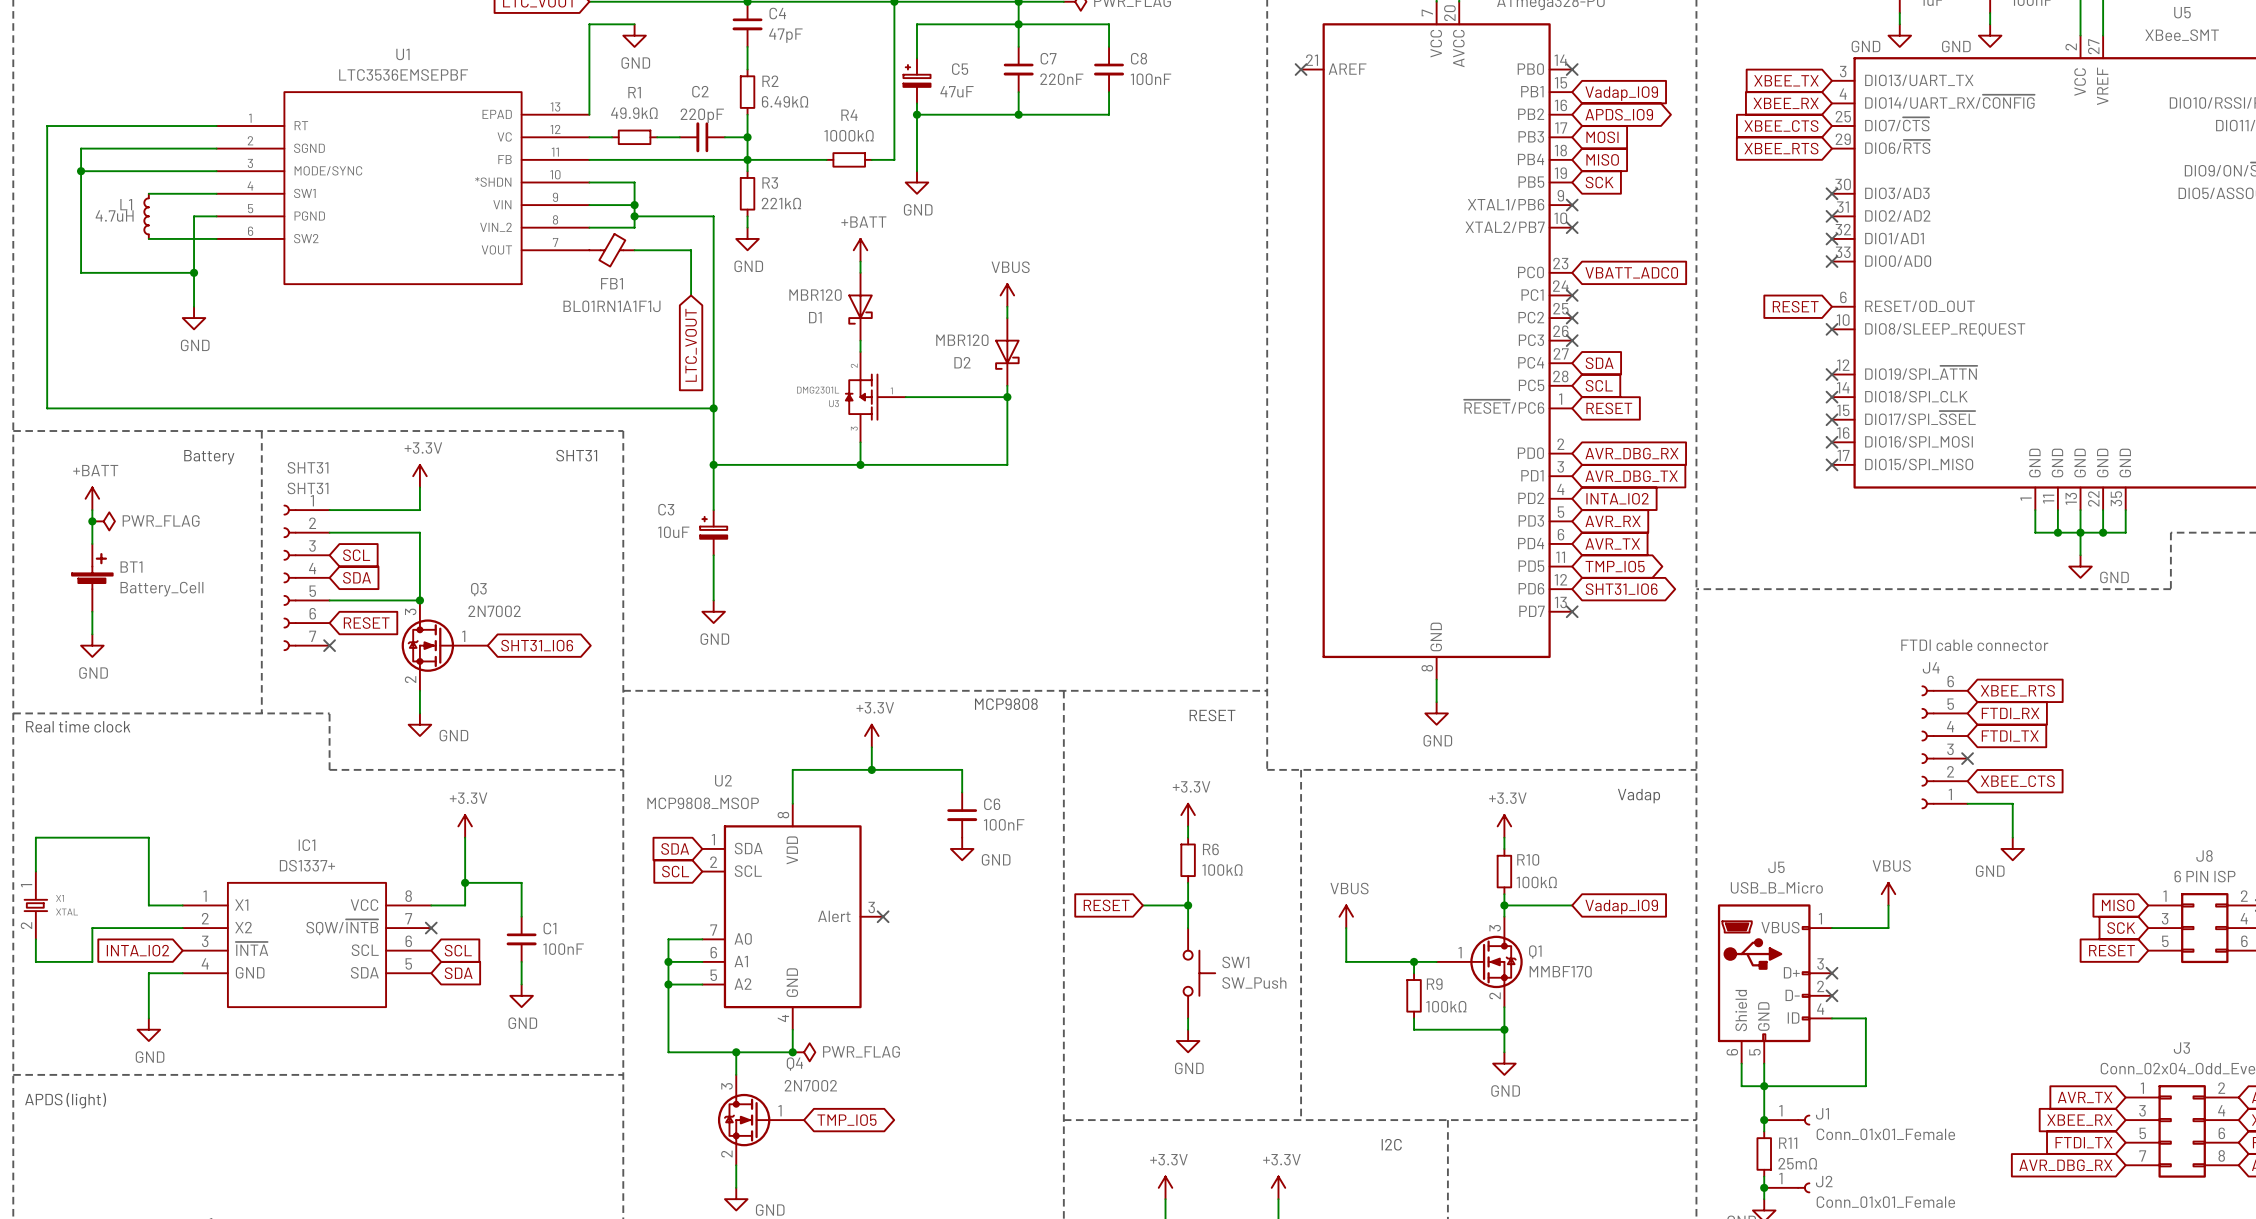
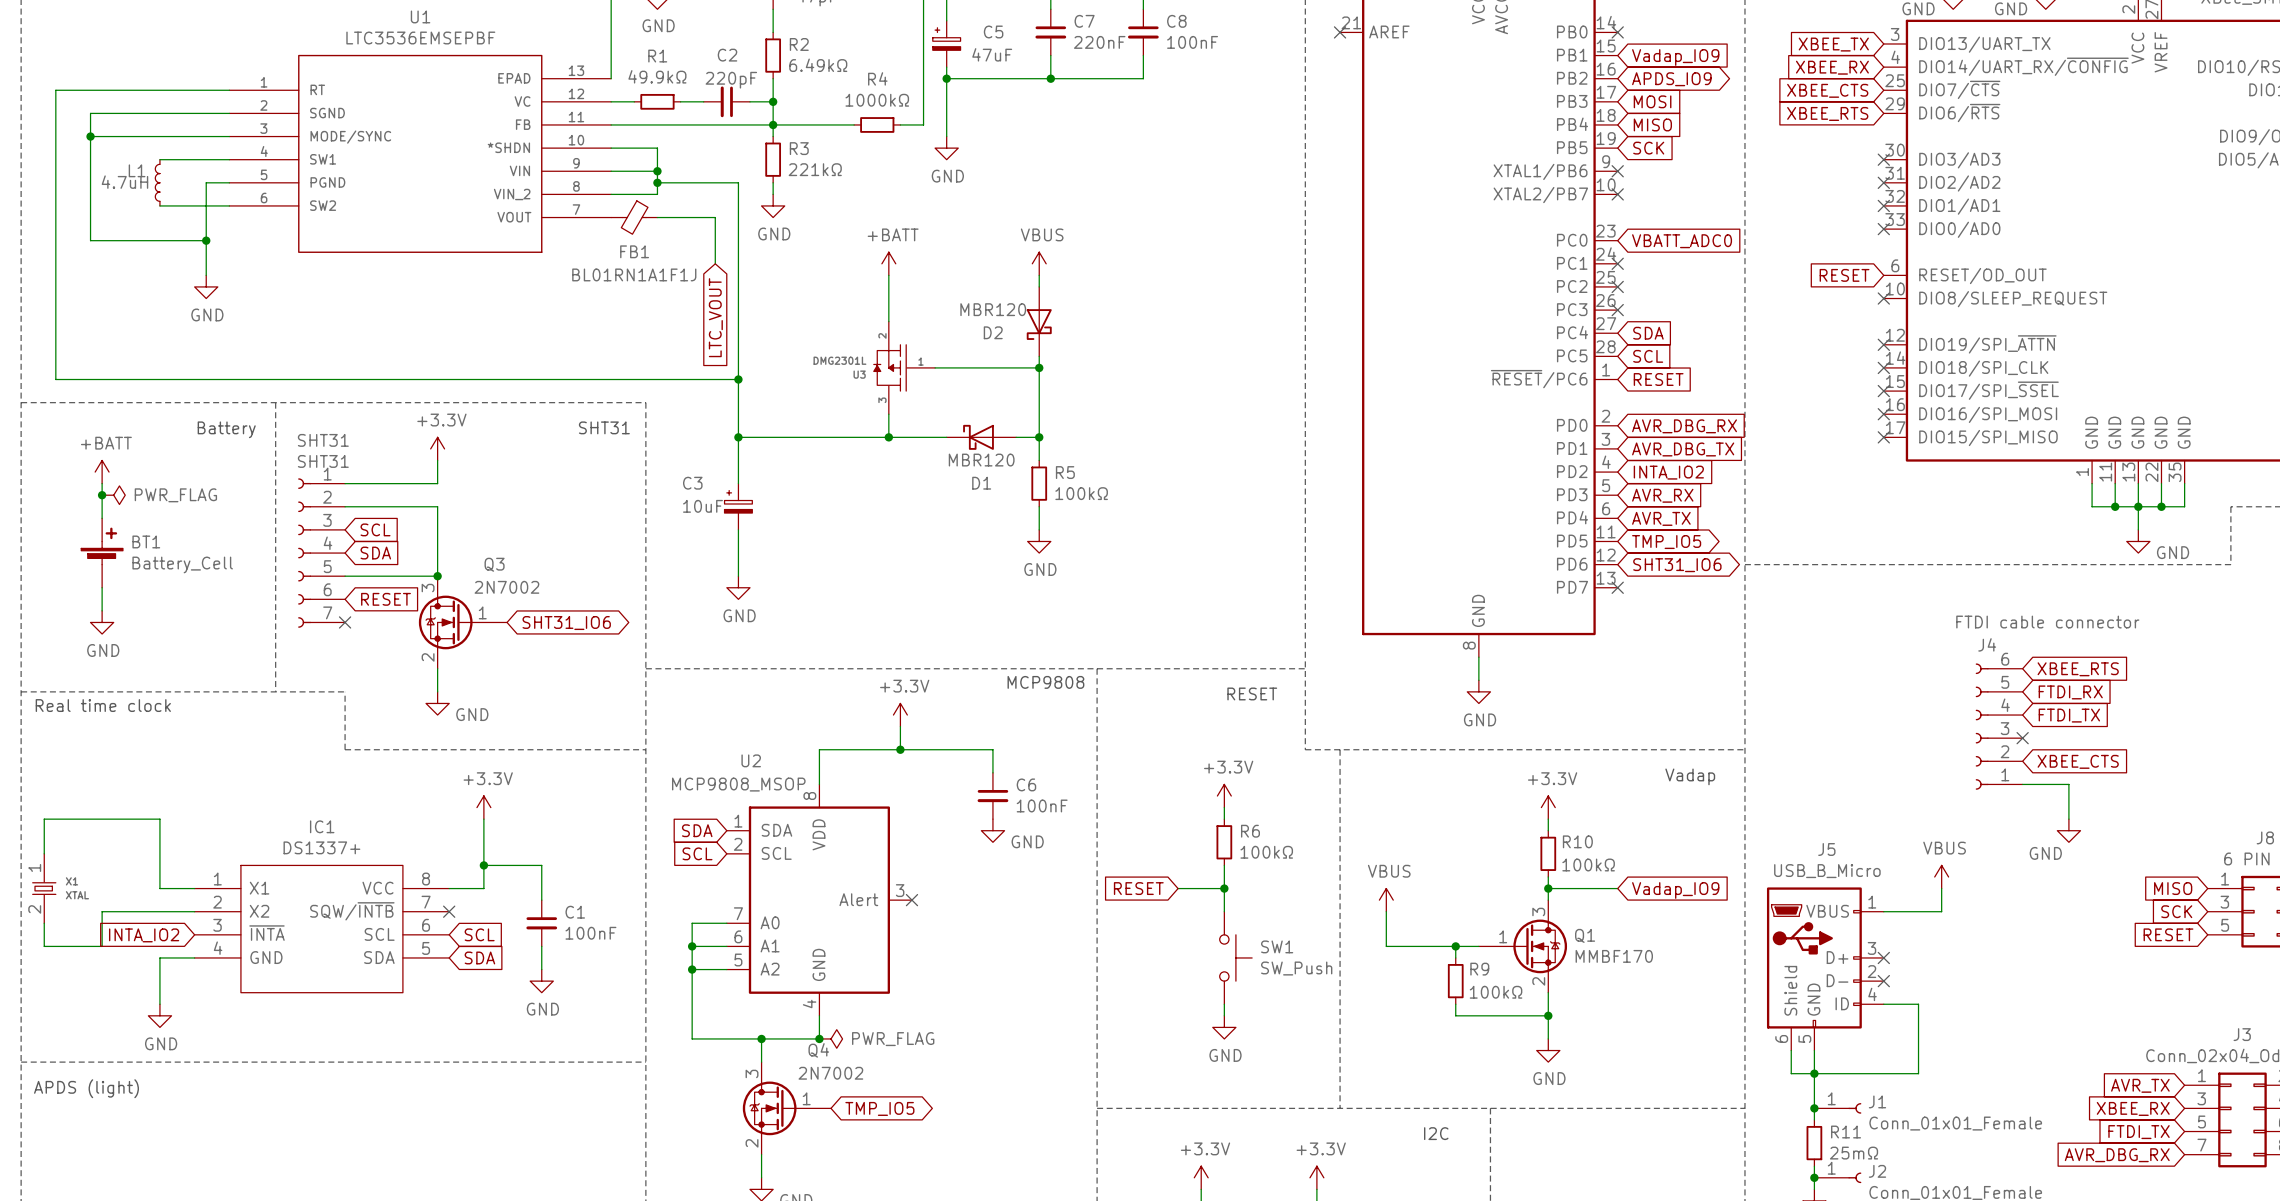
power symbol position: +BATT (860, 250) -> +BATT (888, 263)
wire: (860, 261) (860, 272) -> none
D1 value position: MBR120 (815, 295) -> MBR120 (981, 460)
D1 position: (860, 306) -> (981, 437)
D1 rotation: 0° (860, 309) -> 90° clockwise (978, 437)
D1 name position: D1 (815, 317) -> D1 (981, 483)
wire: none -> (1039, 437) (1039, 460)
junction: none -> (1039, 437)
R5: none -> 100kΩ (1039, 483)
wire: none -> (1039, 506) (1039, 529)
power symbol: none -> GND (1039, 541)

